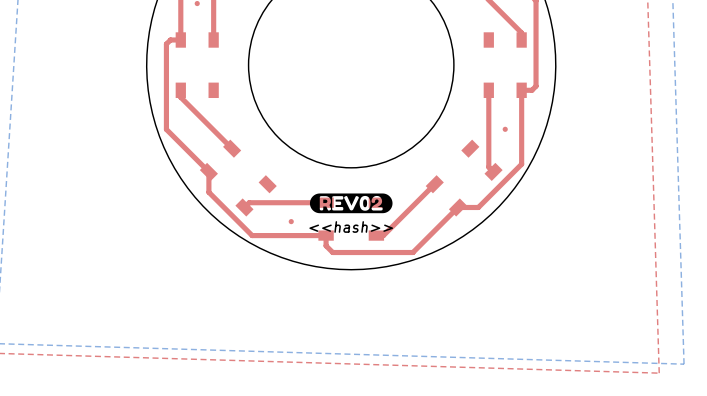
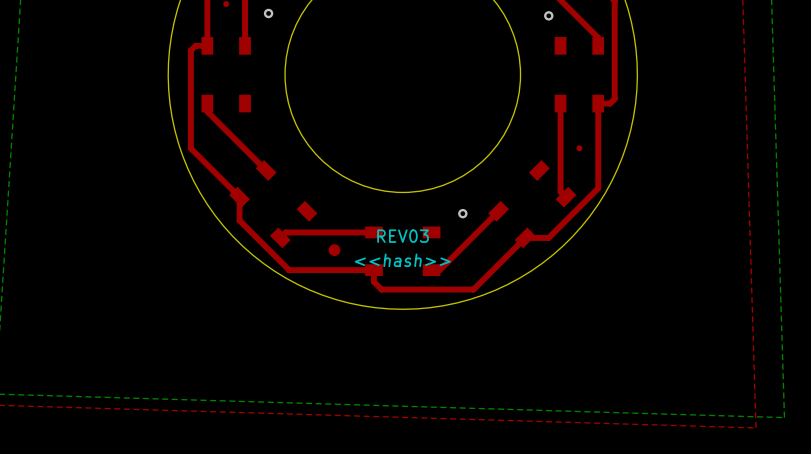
via: none -> (268, 13)
via: none -> (548, 15)
via: none -> (462, 213)
drawing: [309, 193, 393, 214] -> none
text: none -> REV03 (403, 236)
part footprint: [288, 219, 294, 225] -> [328, 244, 341, 257]

